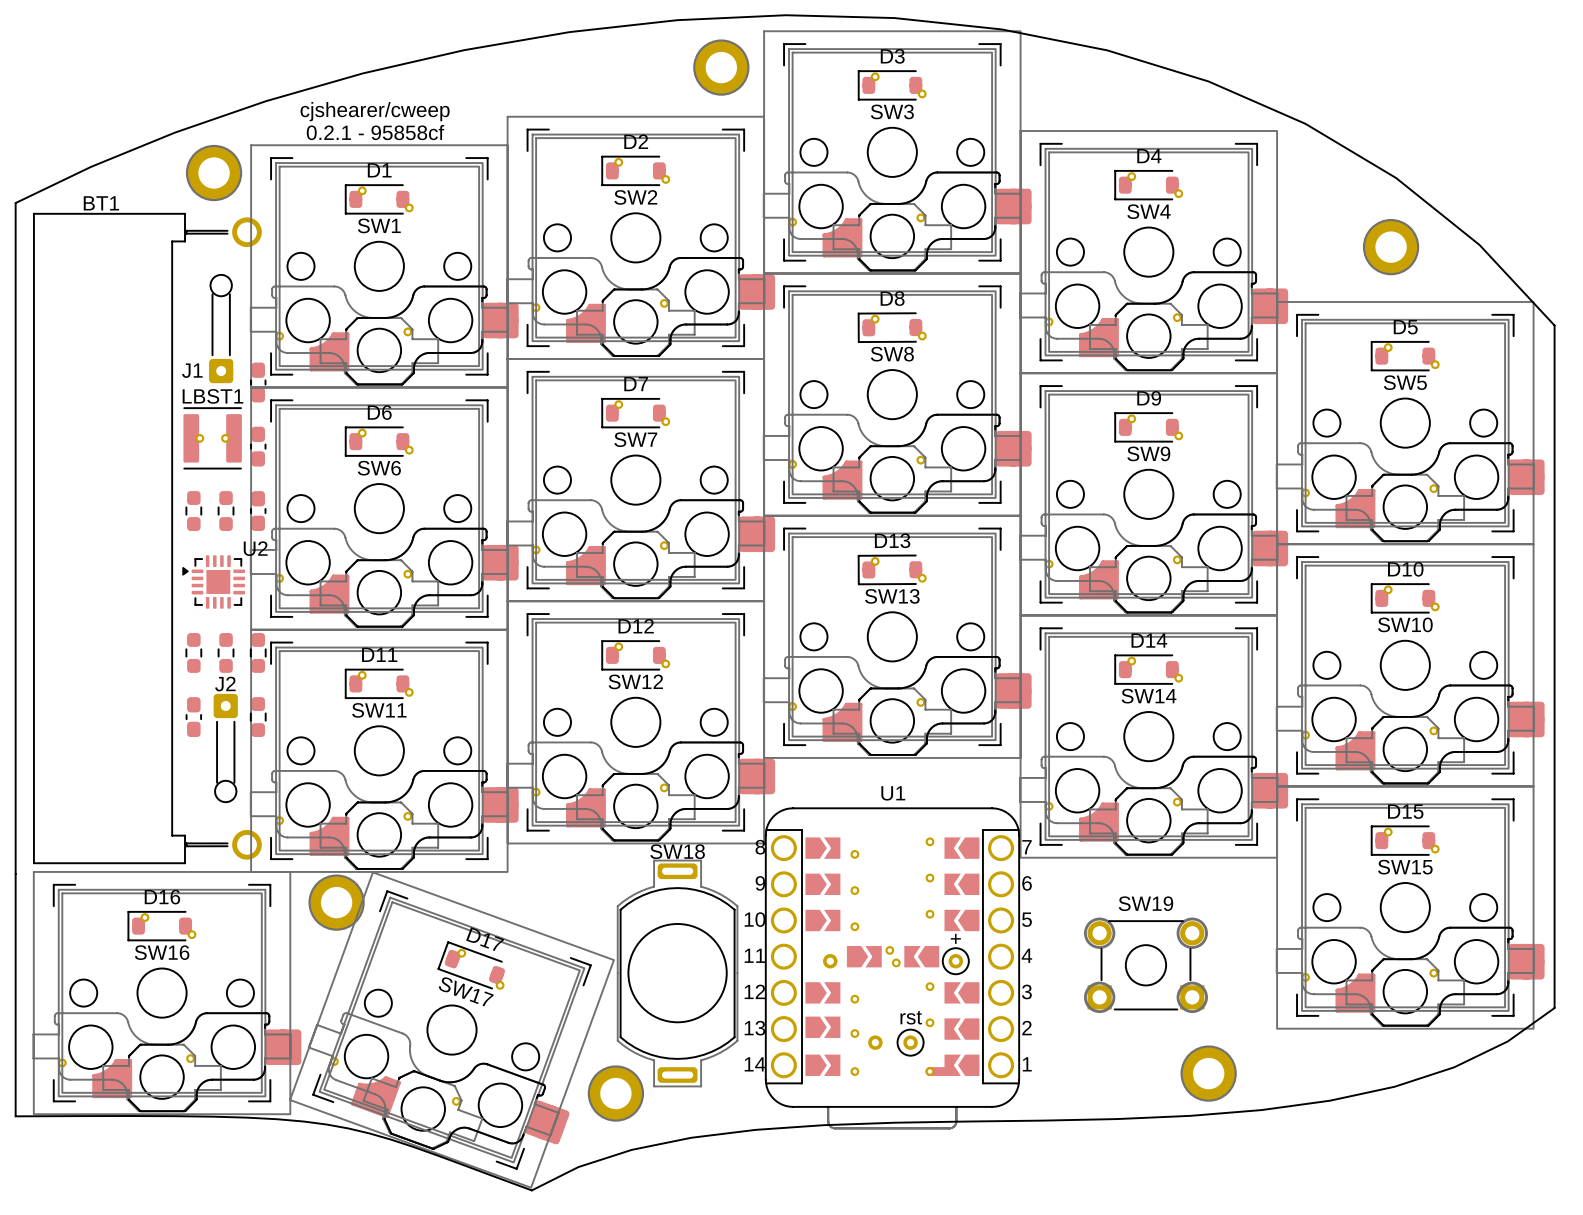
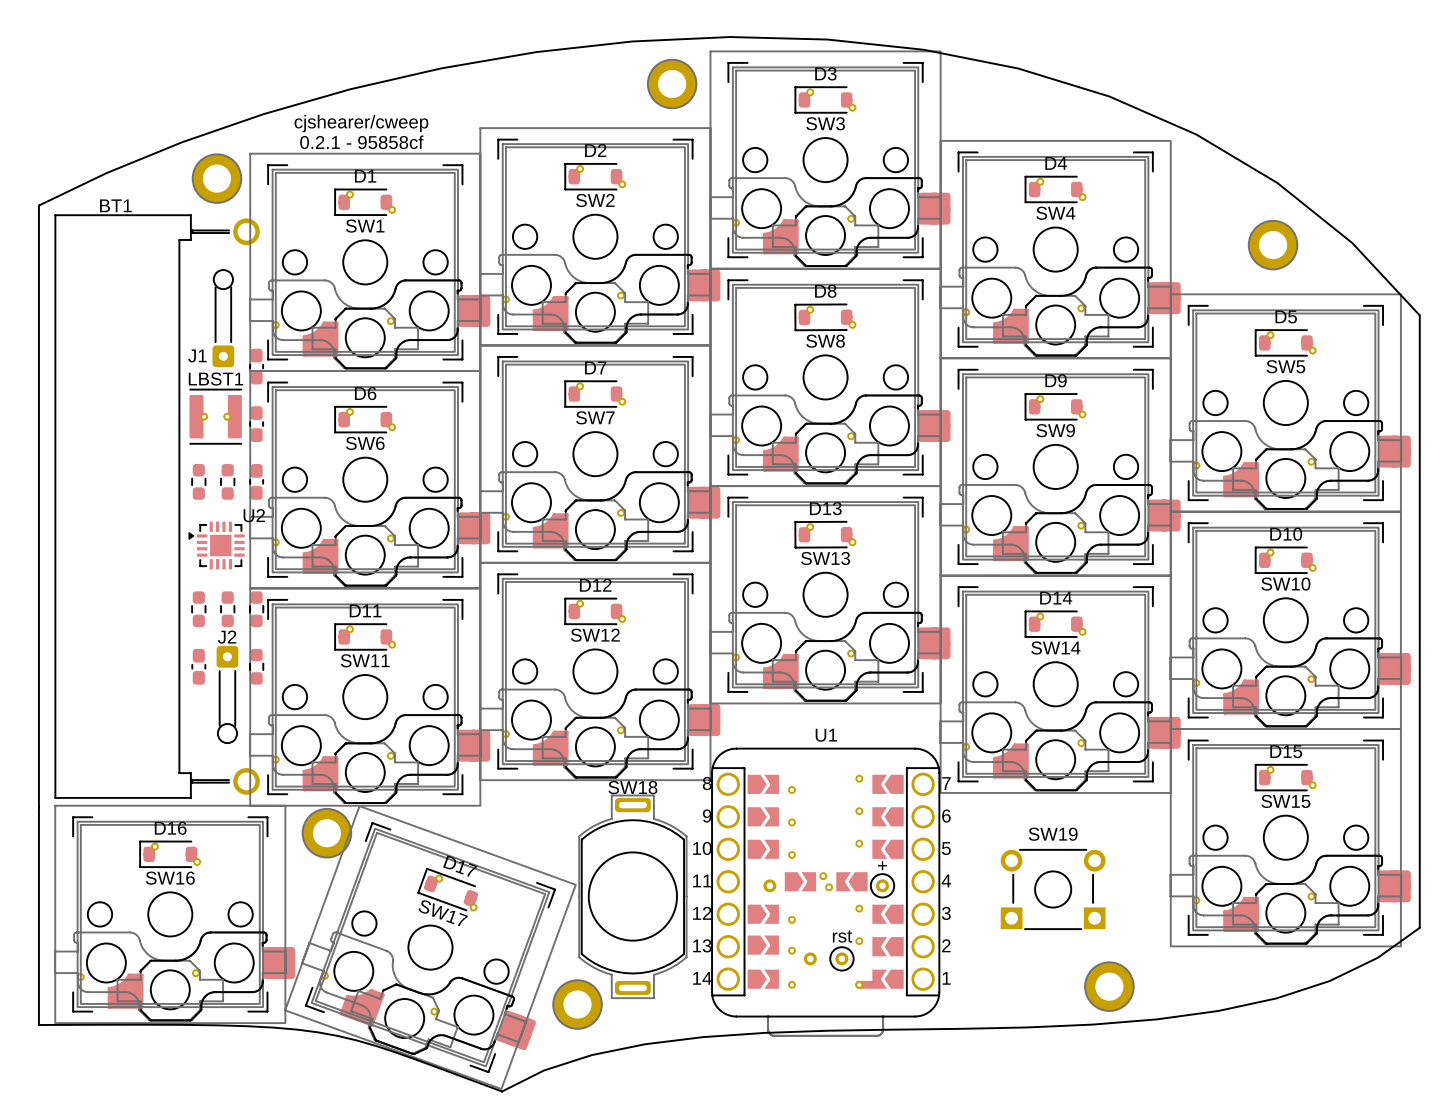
SW19 footprint: [1083, 917, 1208, 1014] -> [1000, 849, 1106, 930]

